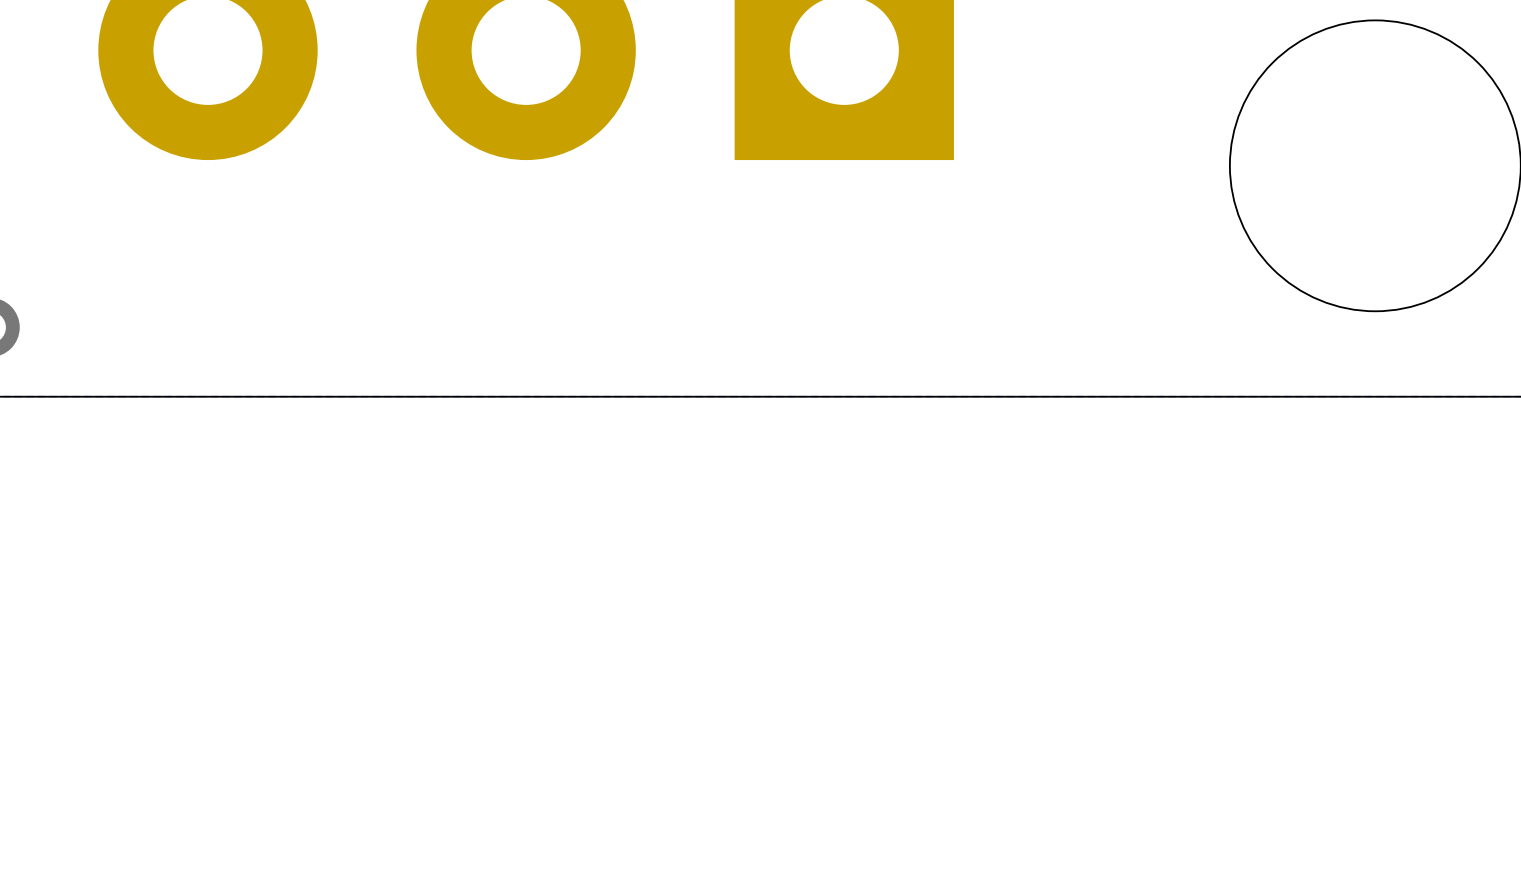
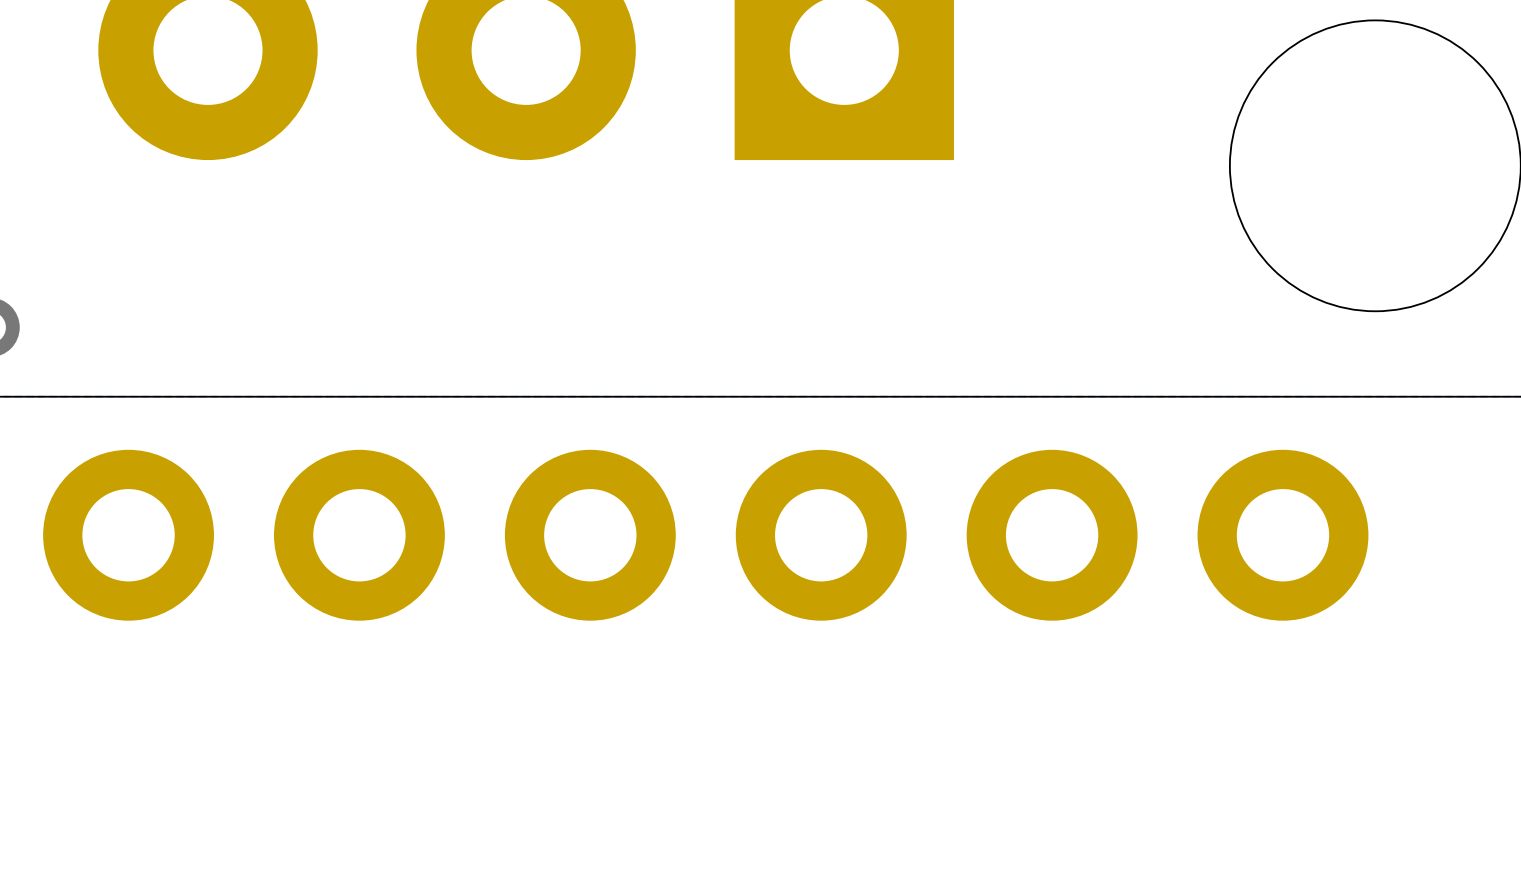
part: none -> (705, 535)

